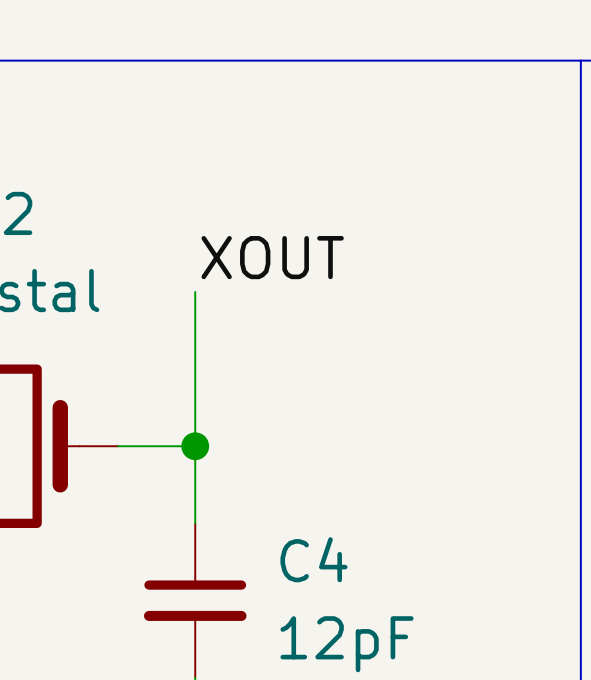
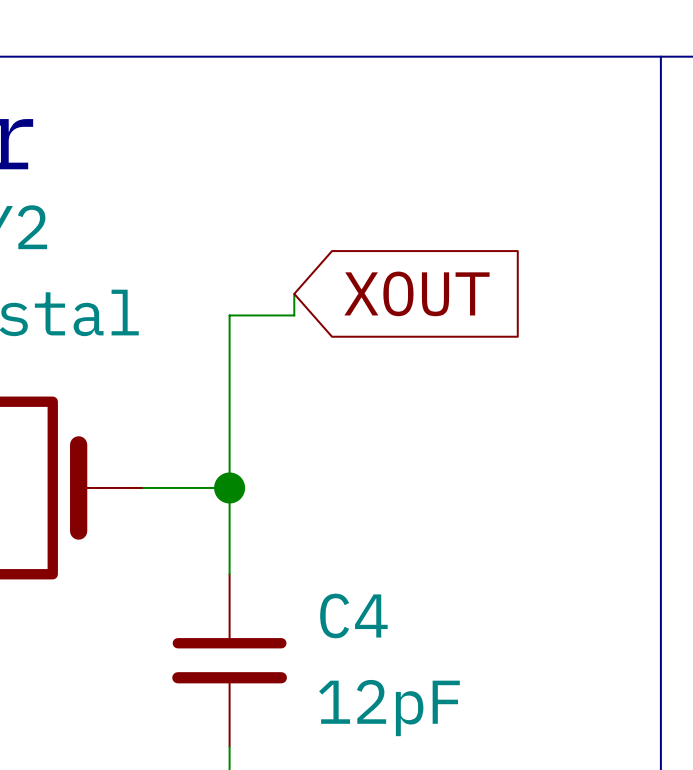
label: XOUT (272, 257) -> none
wire: none -> (294, 293) (294, 315) (229, 315)
global label: none -> XOUT (416, 293)

